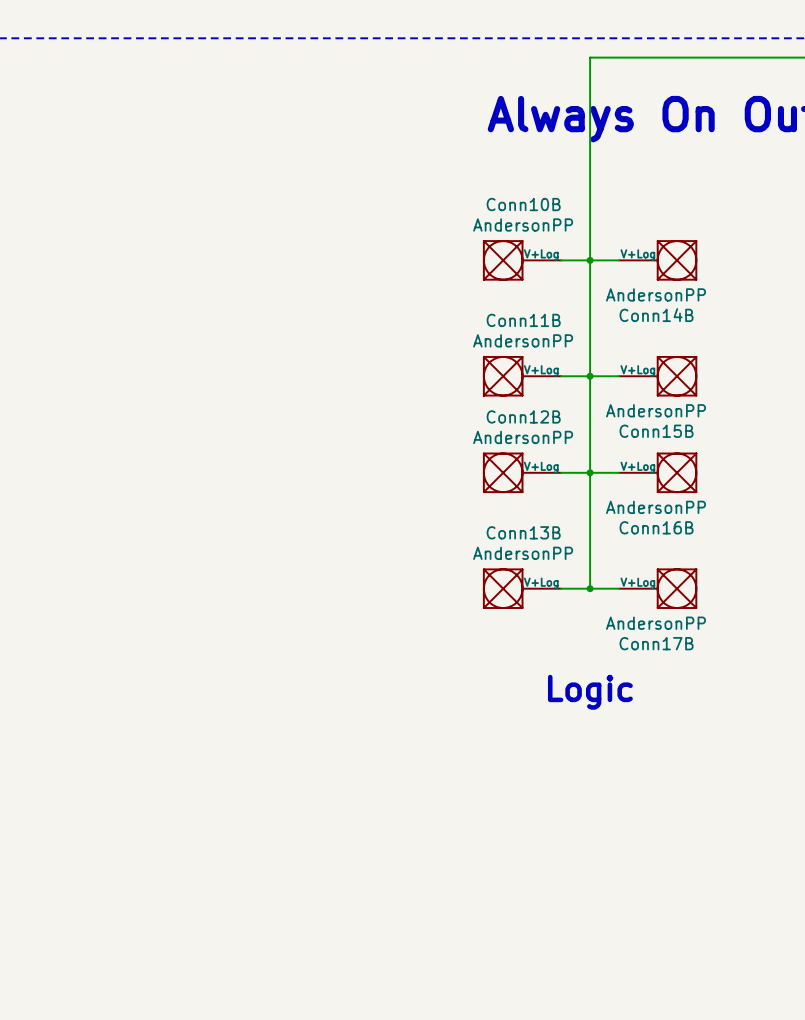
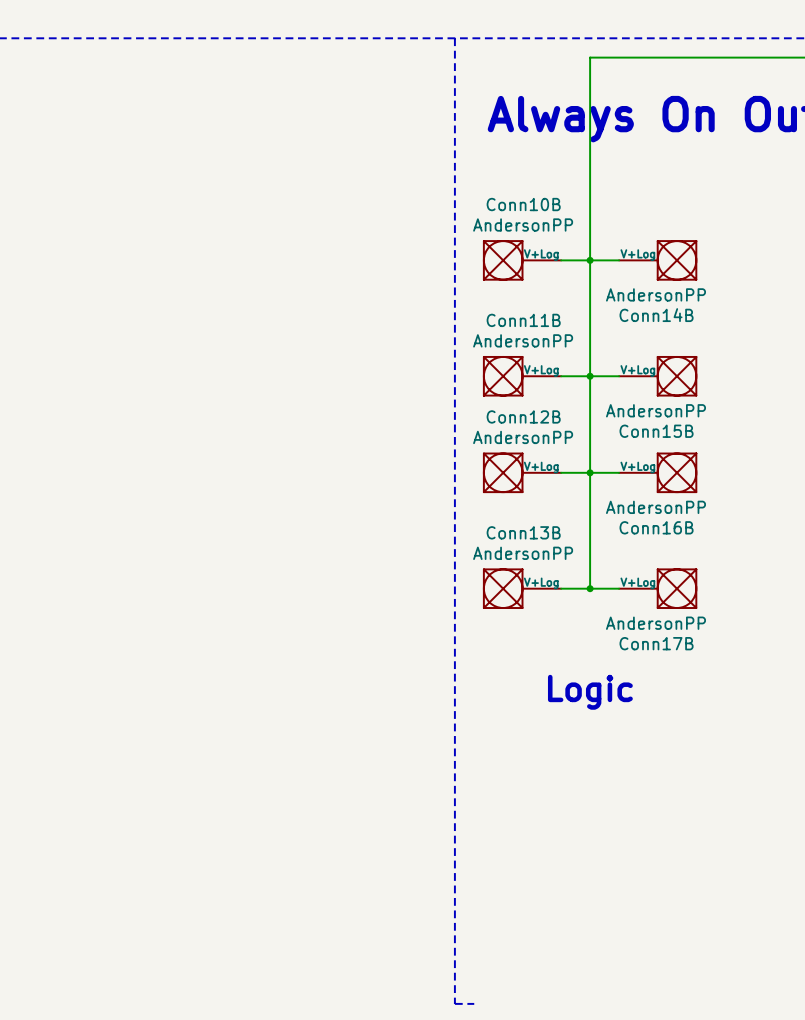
line: none -> (454, 38) (454, 1003) (474, 1003)

